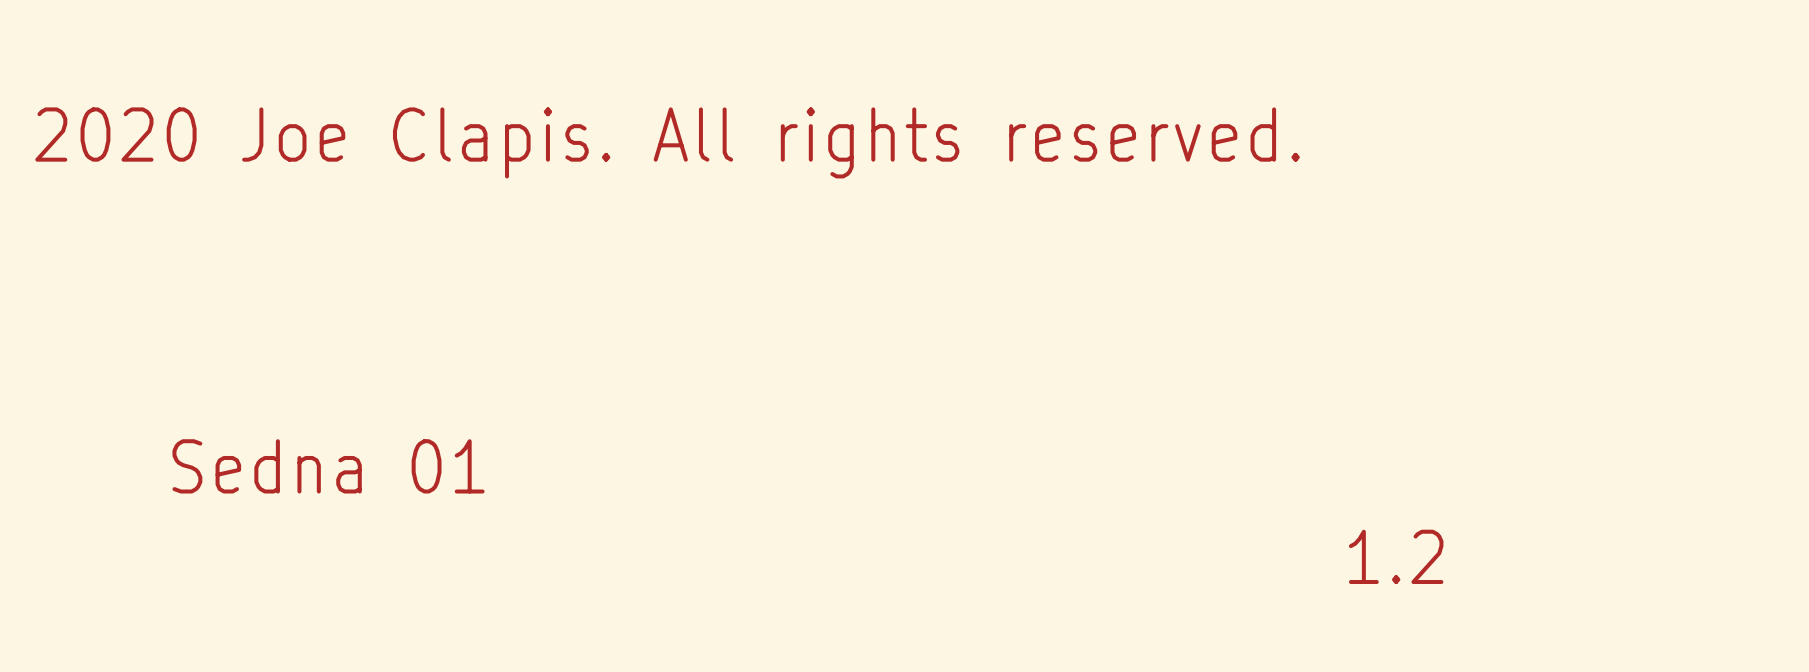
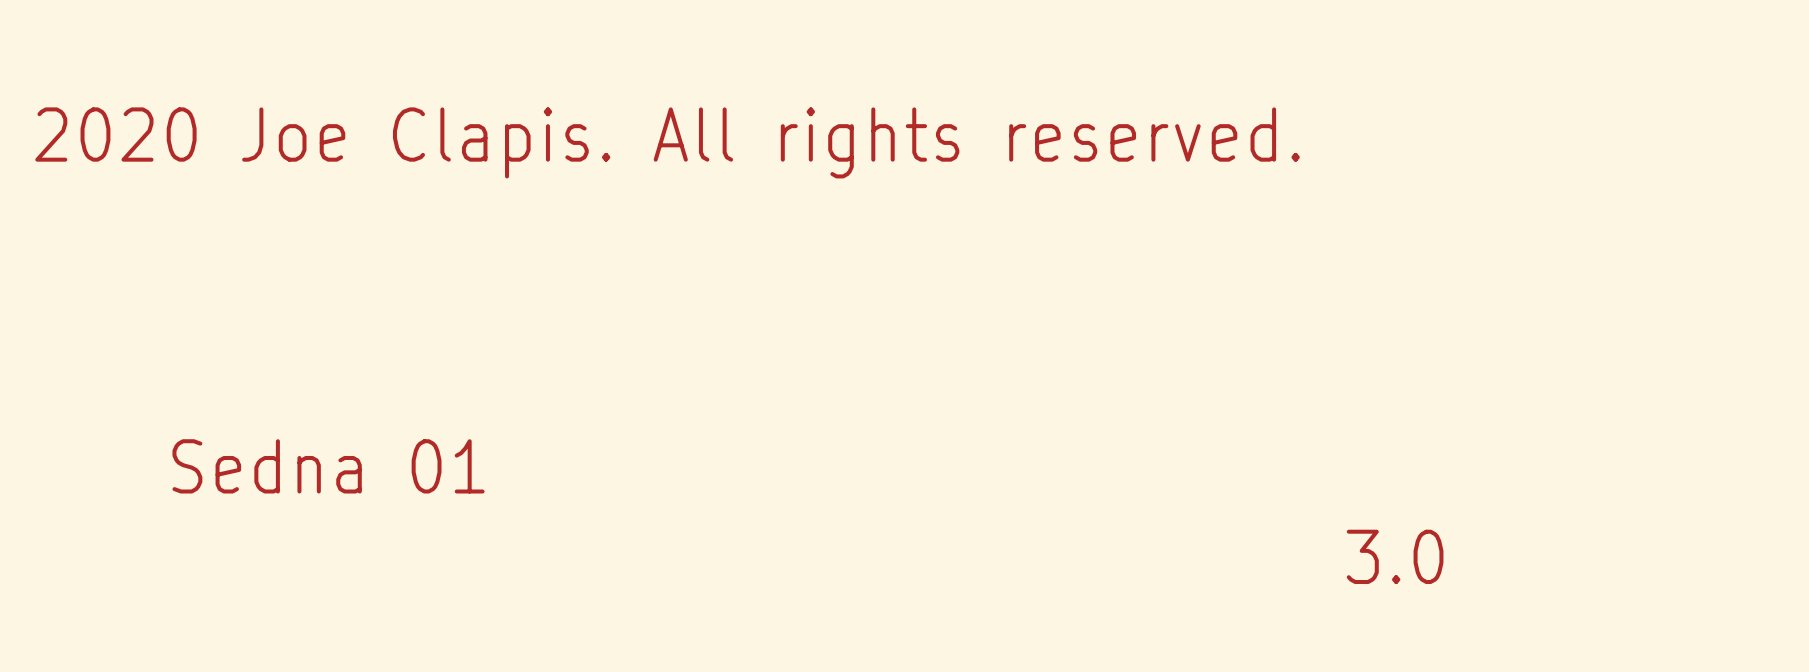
text: 1.2 (1396, 556) -> 3.0 (1395, 556)

